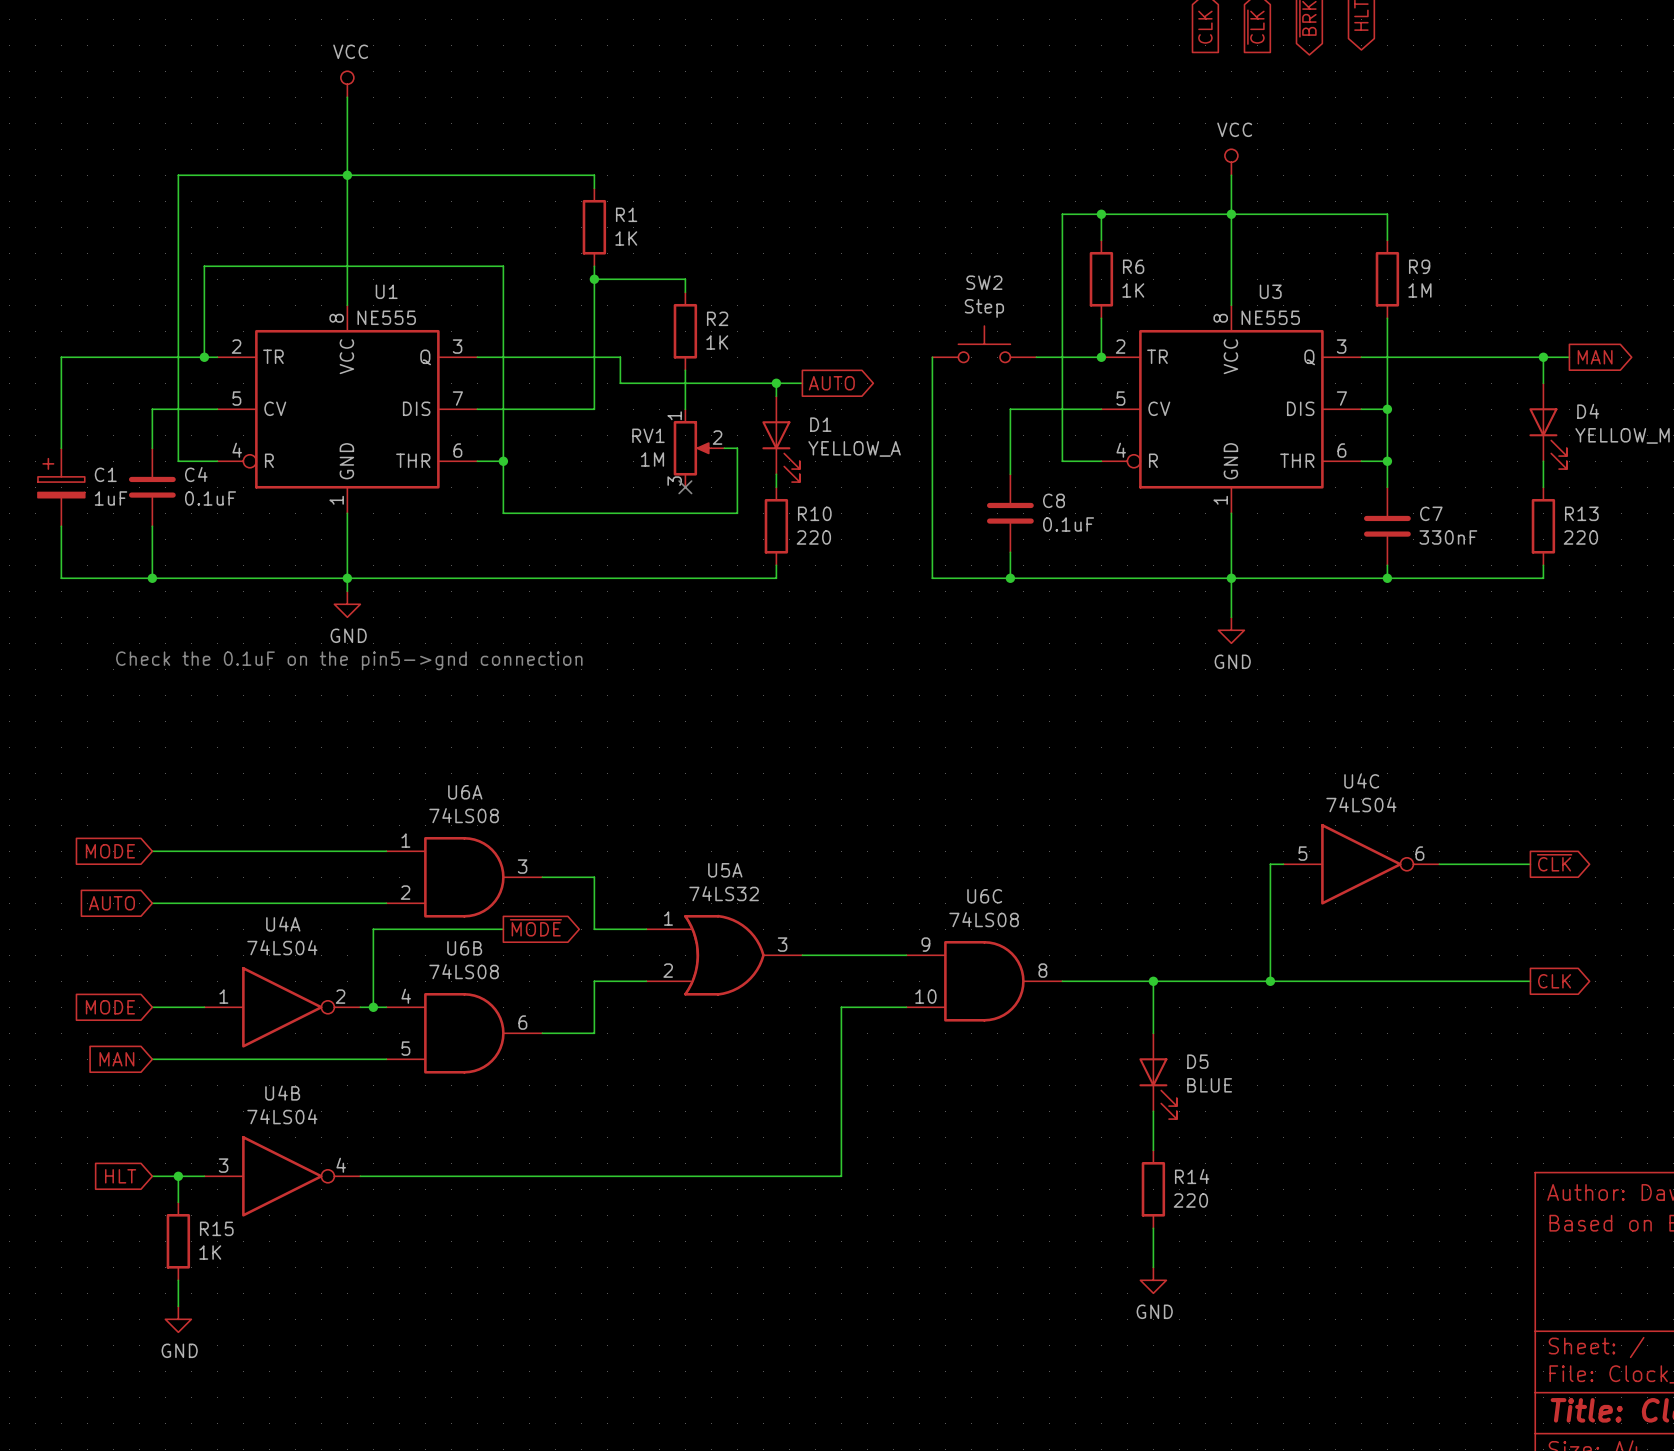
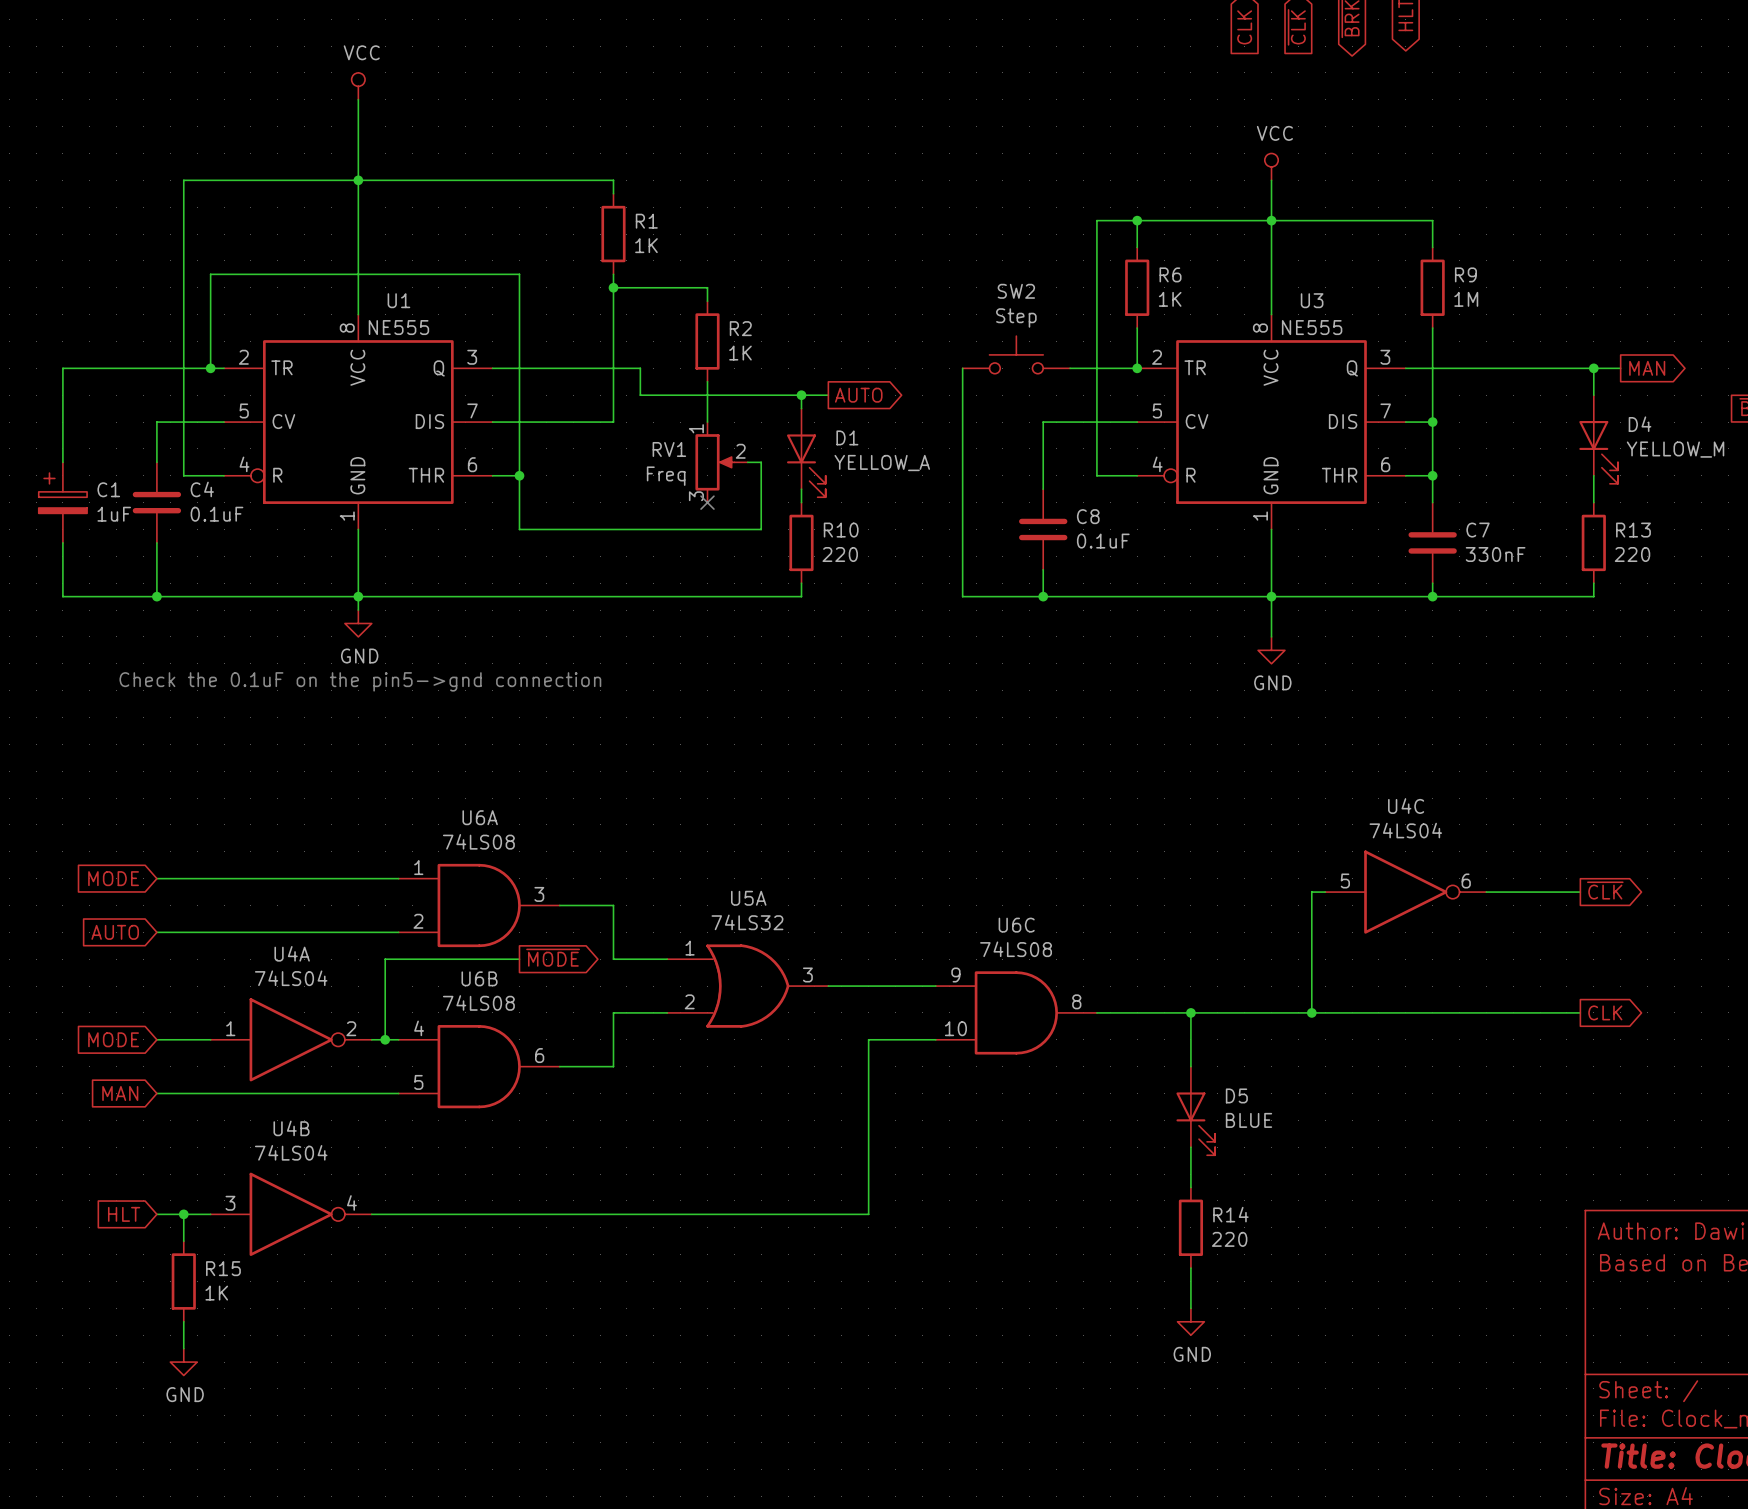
RV1 value: 1M (652, 459) -> Freq (666, 476)

